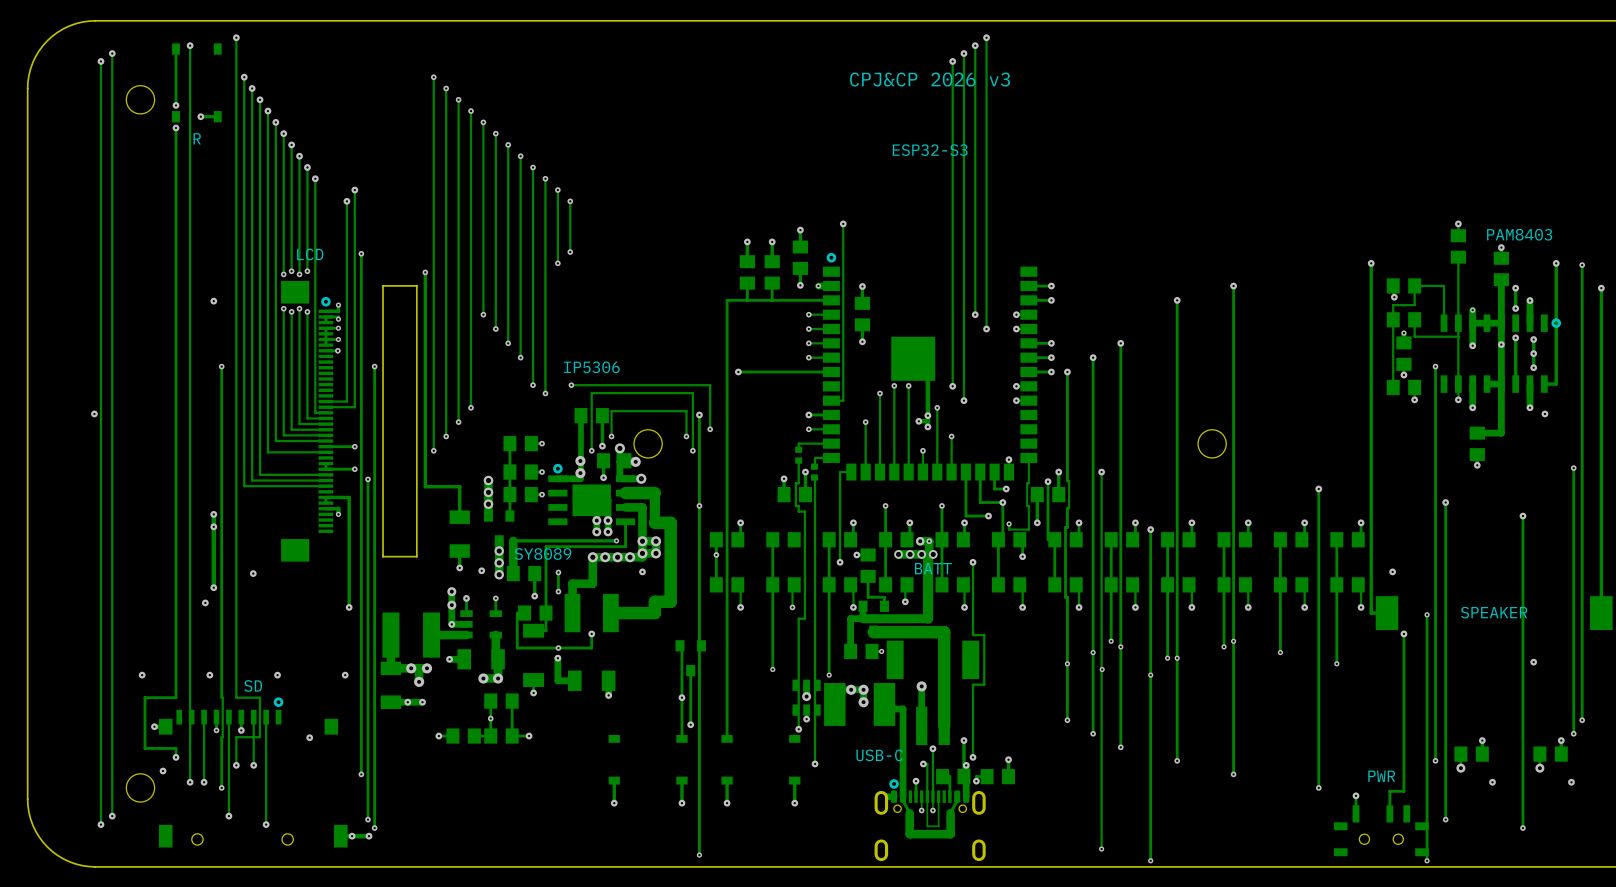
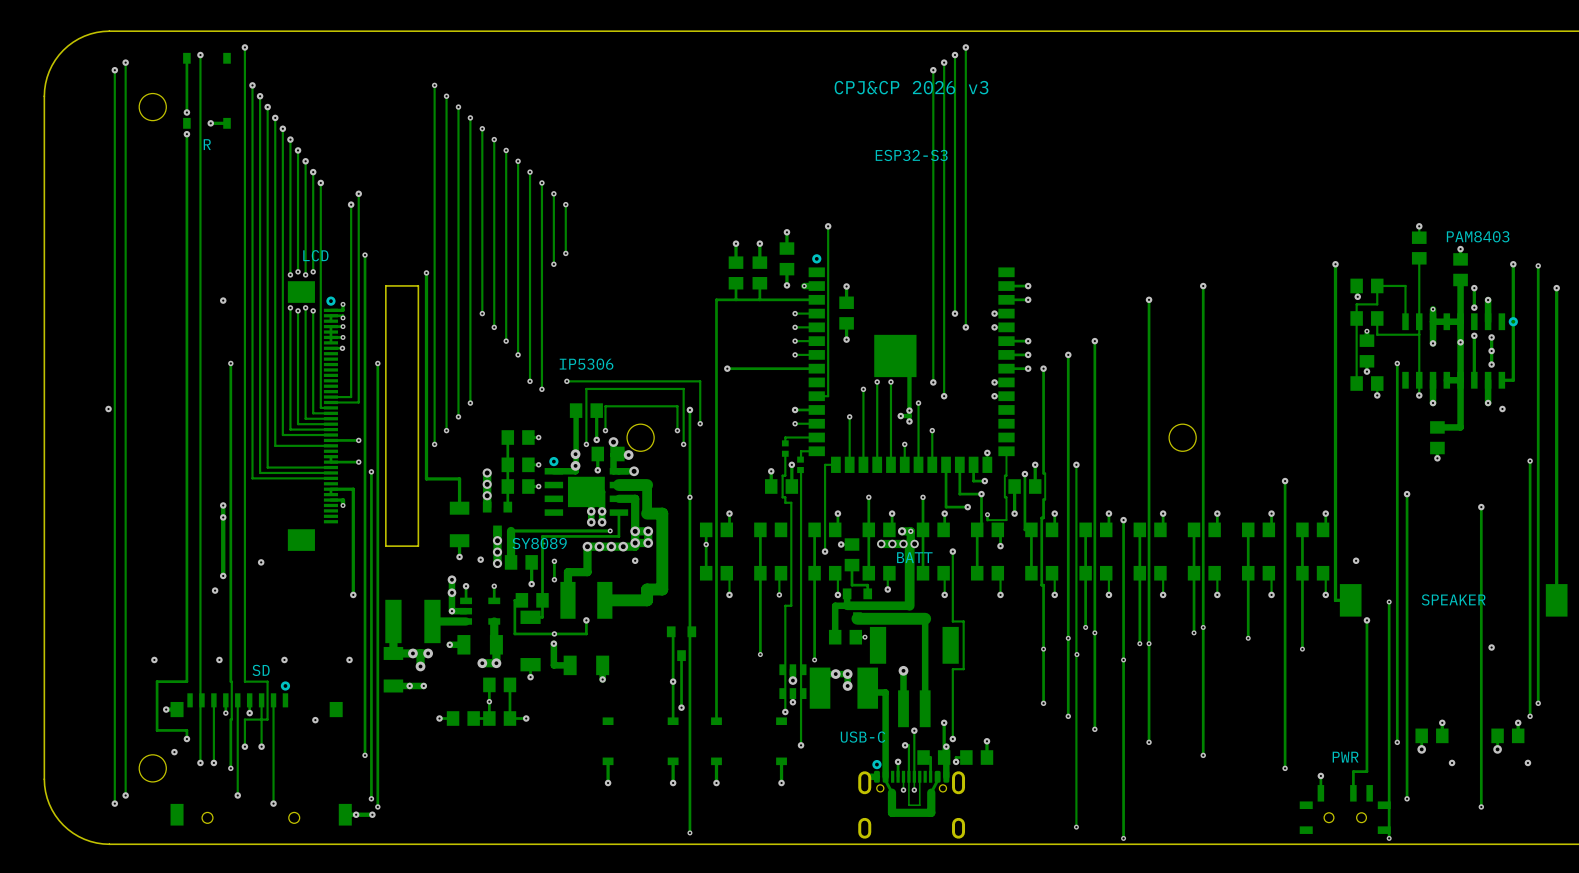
track width: thick (944, 632) (944, 725) -> thin (925, 618) (925, 708)

